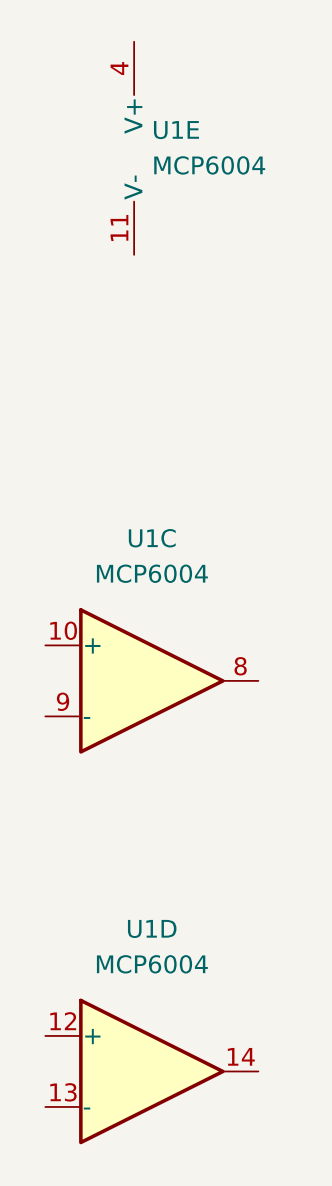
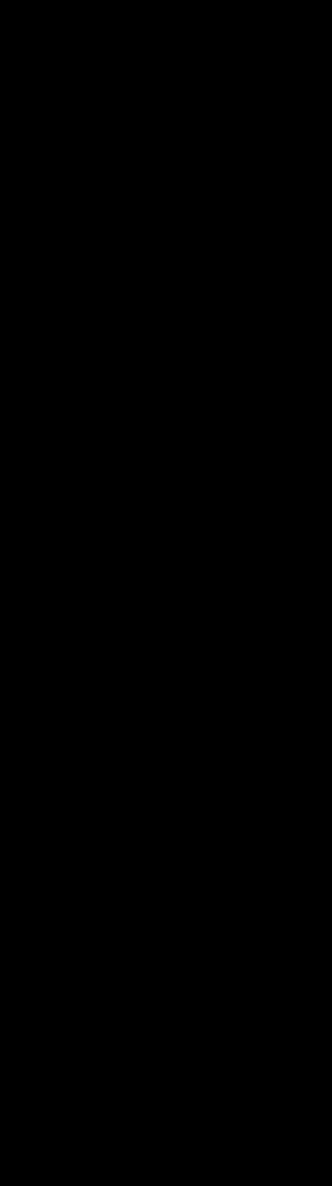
U1E: MCP6004 (134, 148) -> none
U1C: MCP6004 (151, 680) -> none
U1D: MCP6004 (151, 1071) -> none

